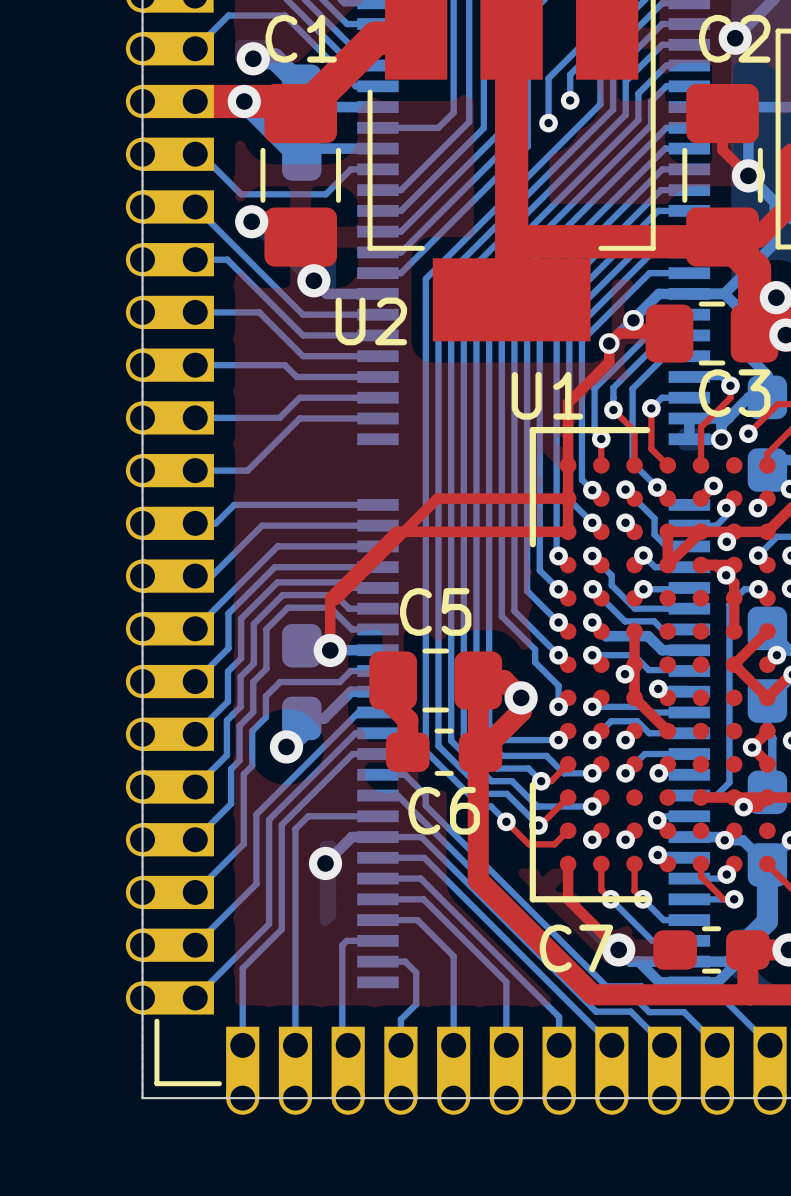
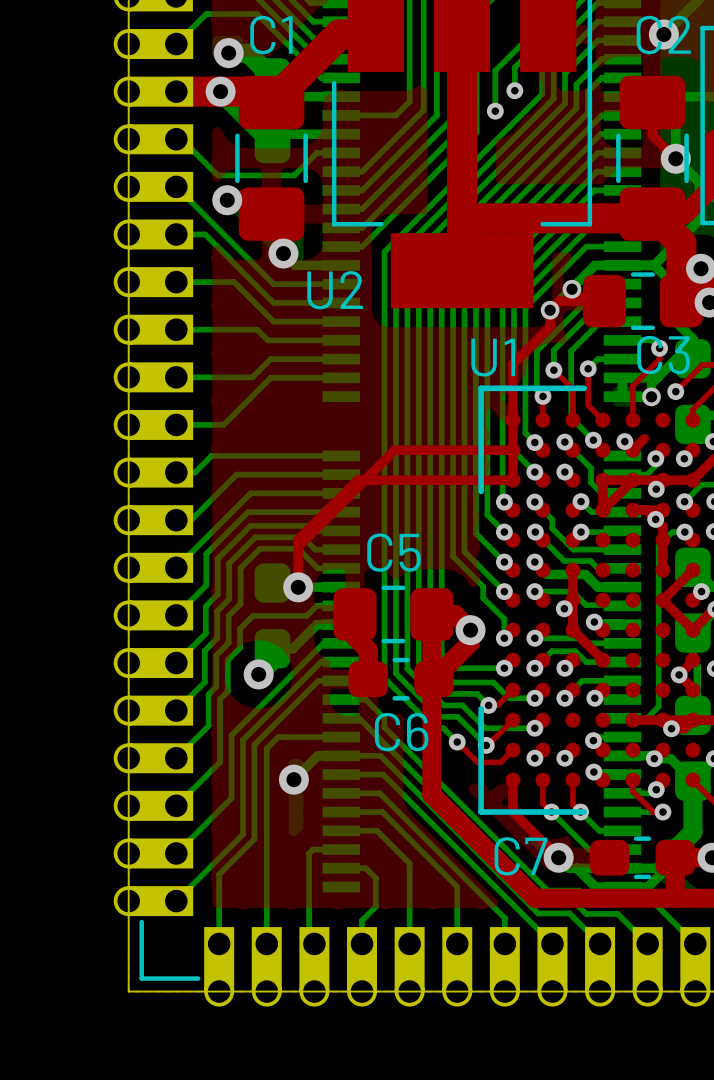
via position: (713, 485) -> (624, 441)

